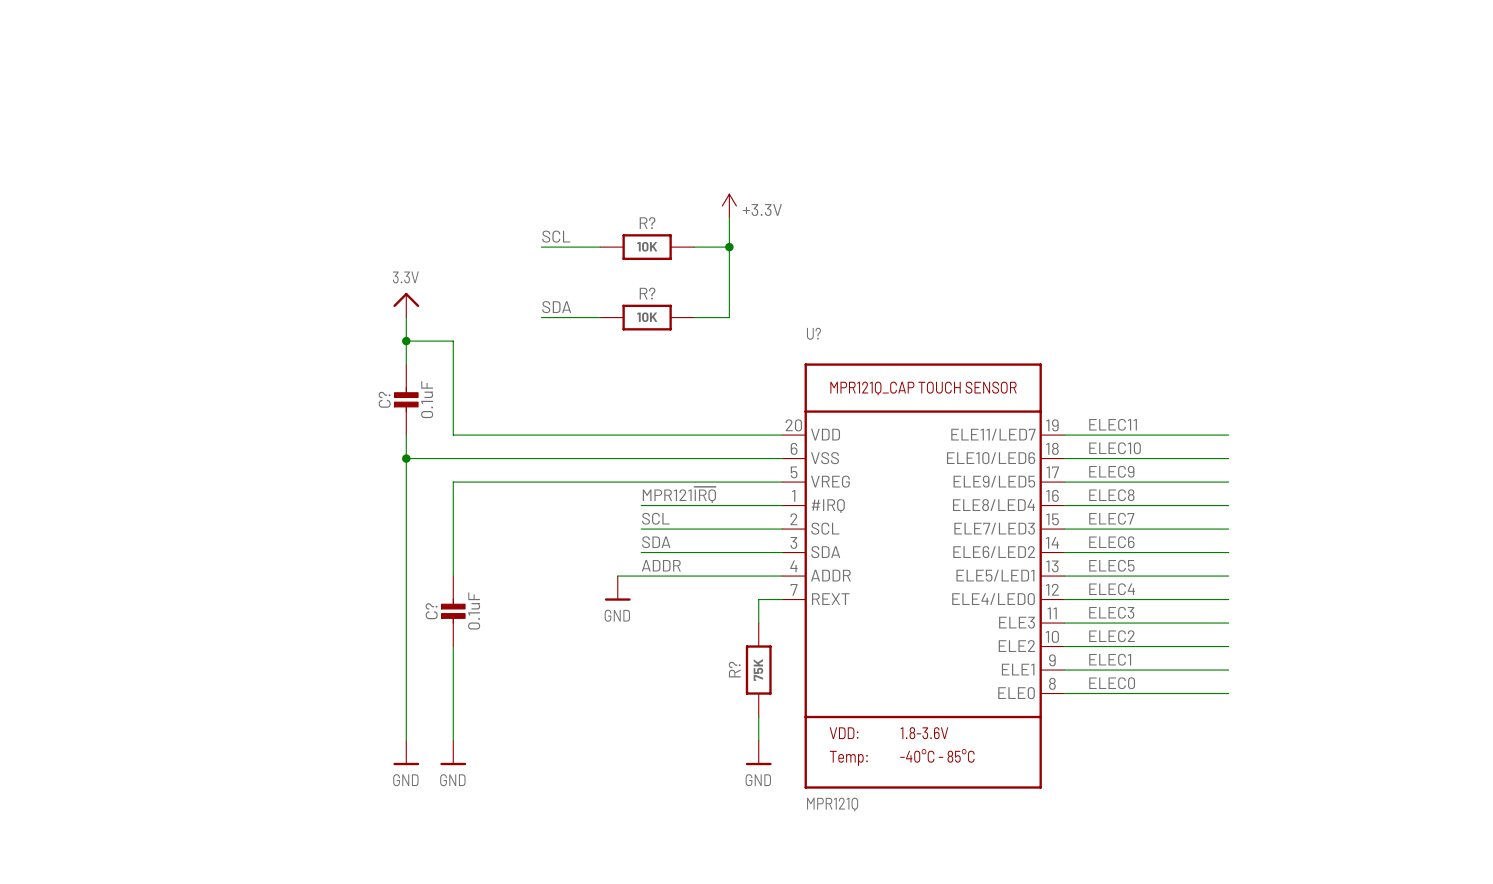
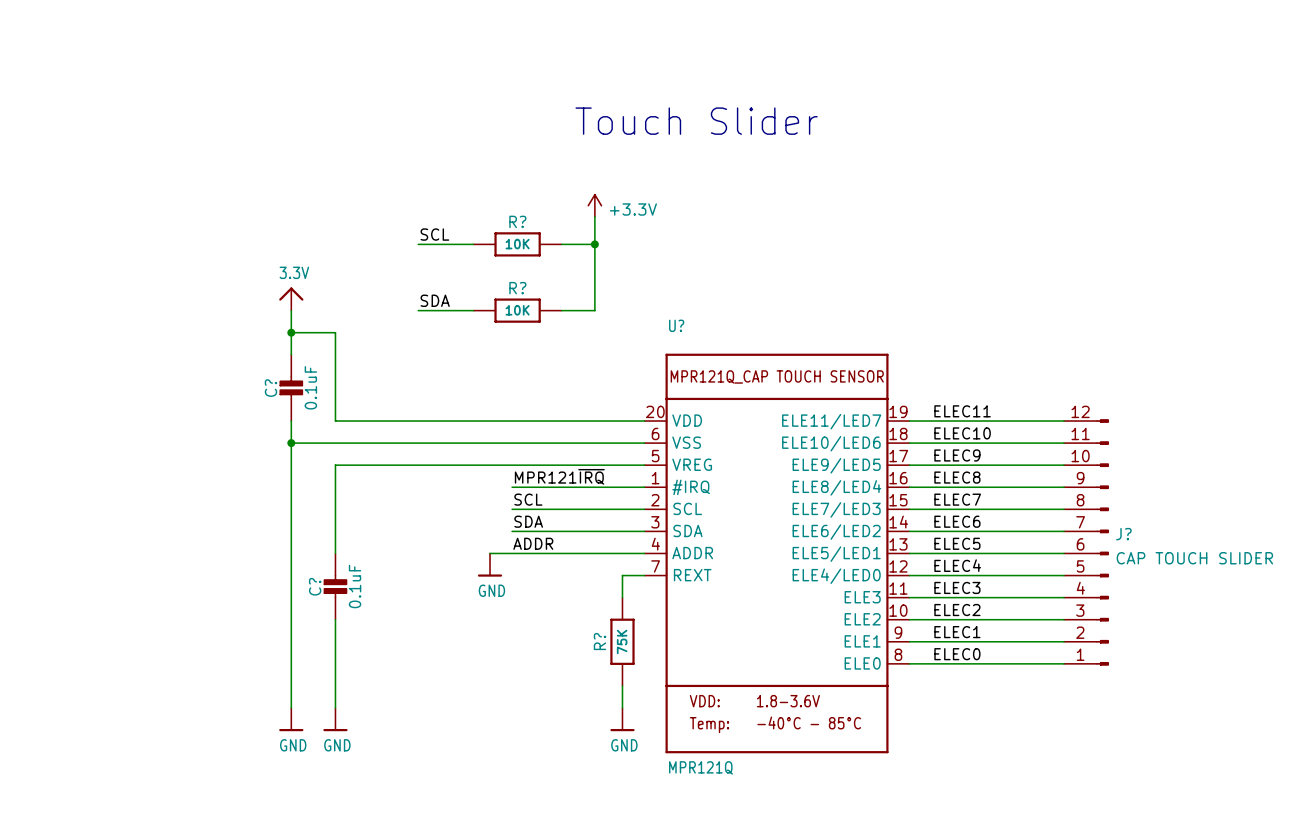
text: none -> Touch Slider (696, 121)
J?: none -> CAP TOUCH SLIDER (1086, 542)

